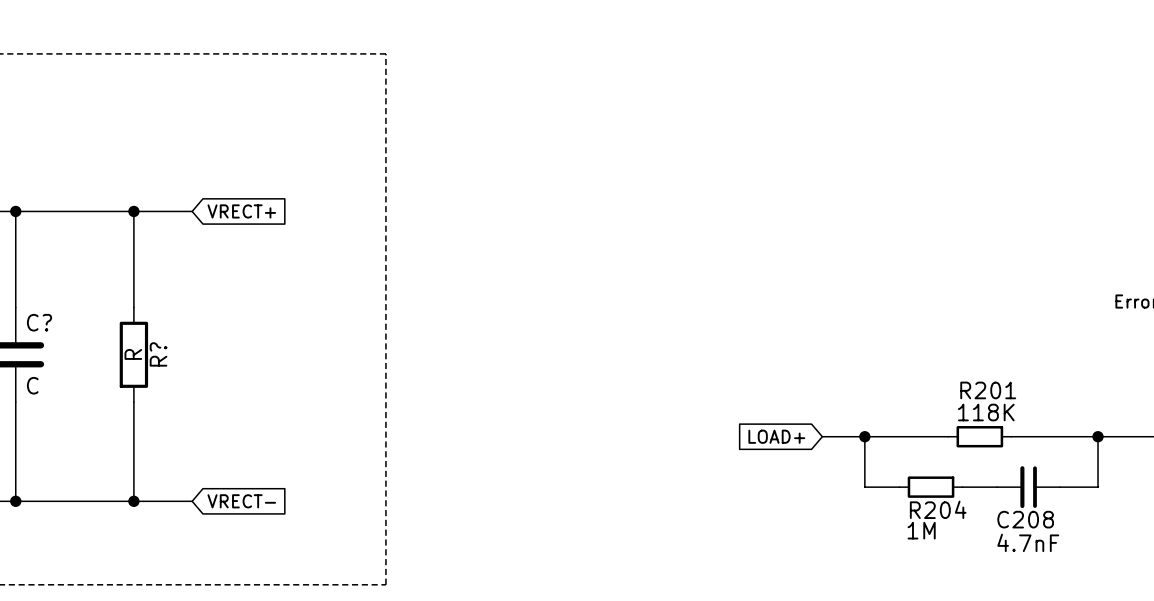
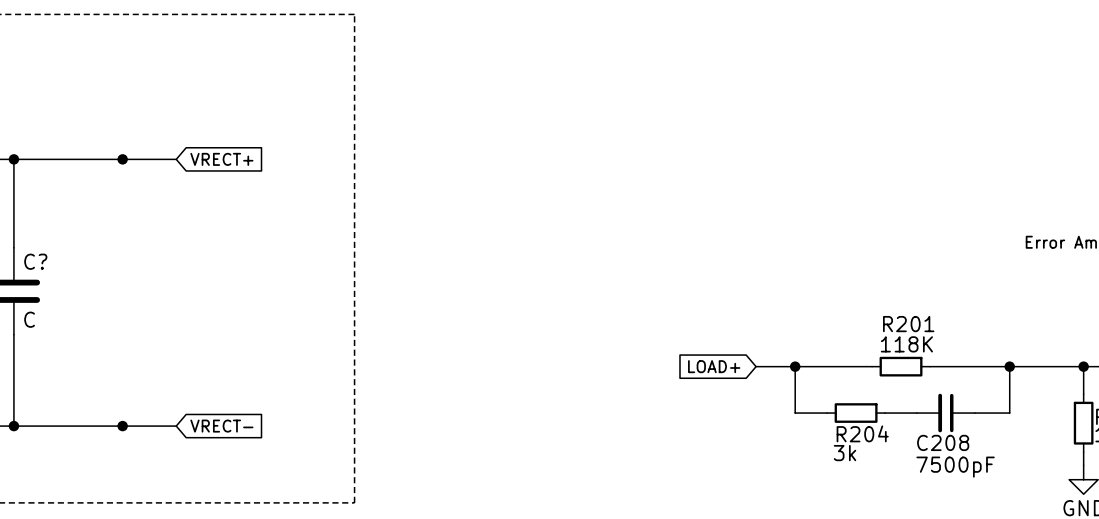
wire: (133, 211) (133, 307) -> none
R?: R (133, 354) -> none
wire: (133, 402) (133, 501) -> none
R204 value: 1M (921, 530) -> 3k (845, 453)
C208 value: 4.7nF (1028, 542) -> 7500pF (955, 467)

